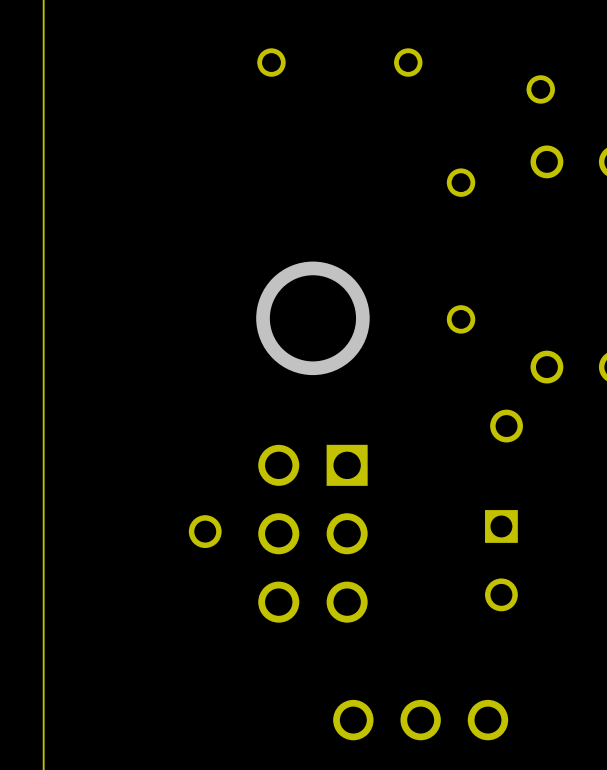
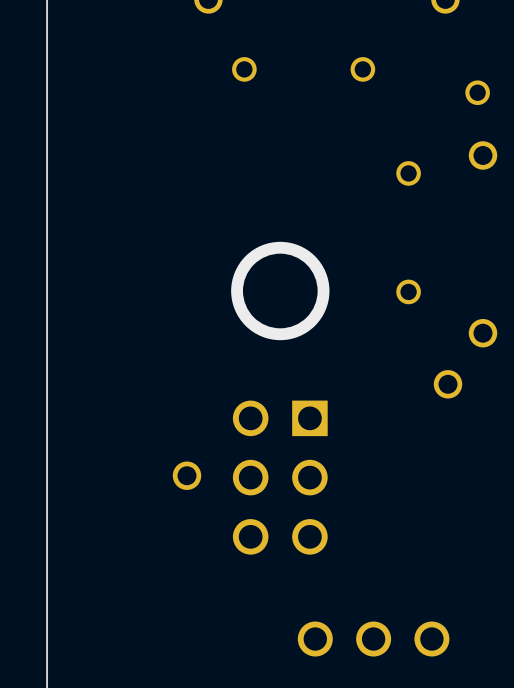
part: (501, 560) -> none

